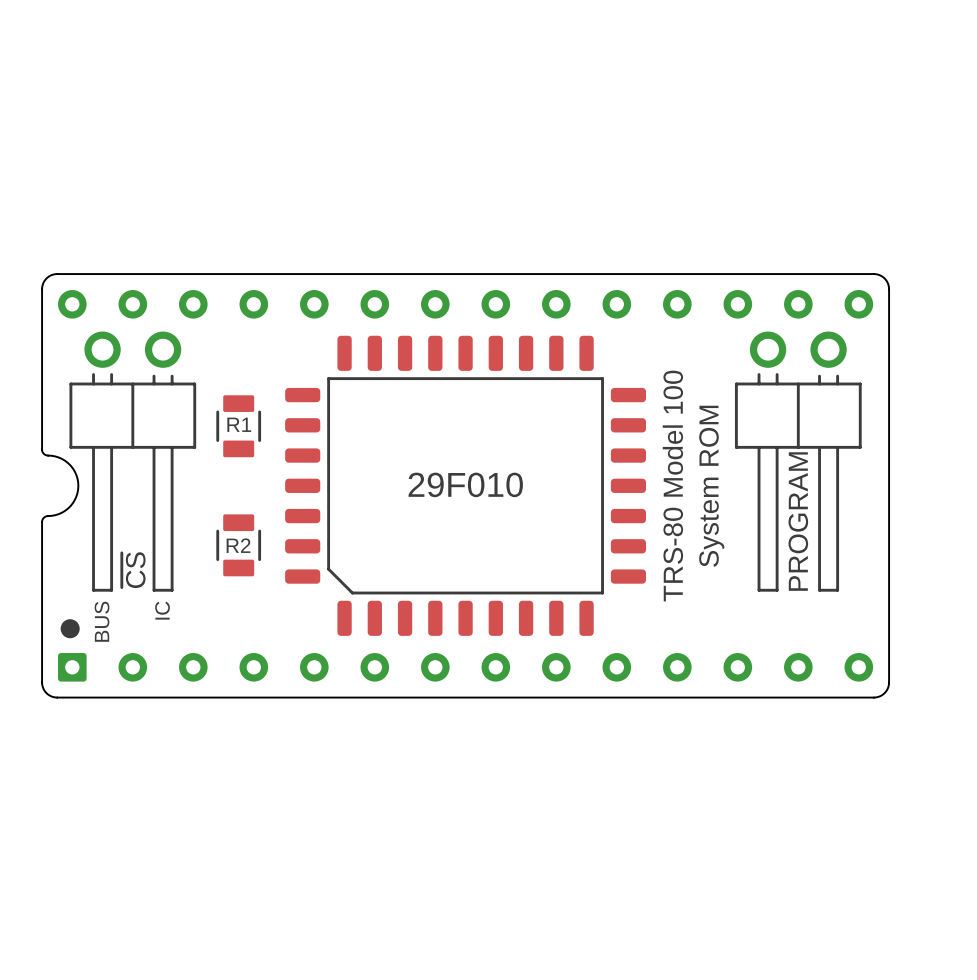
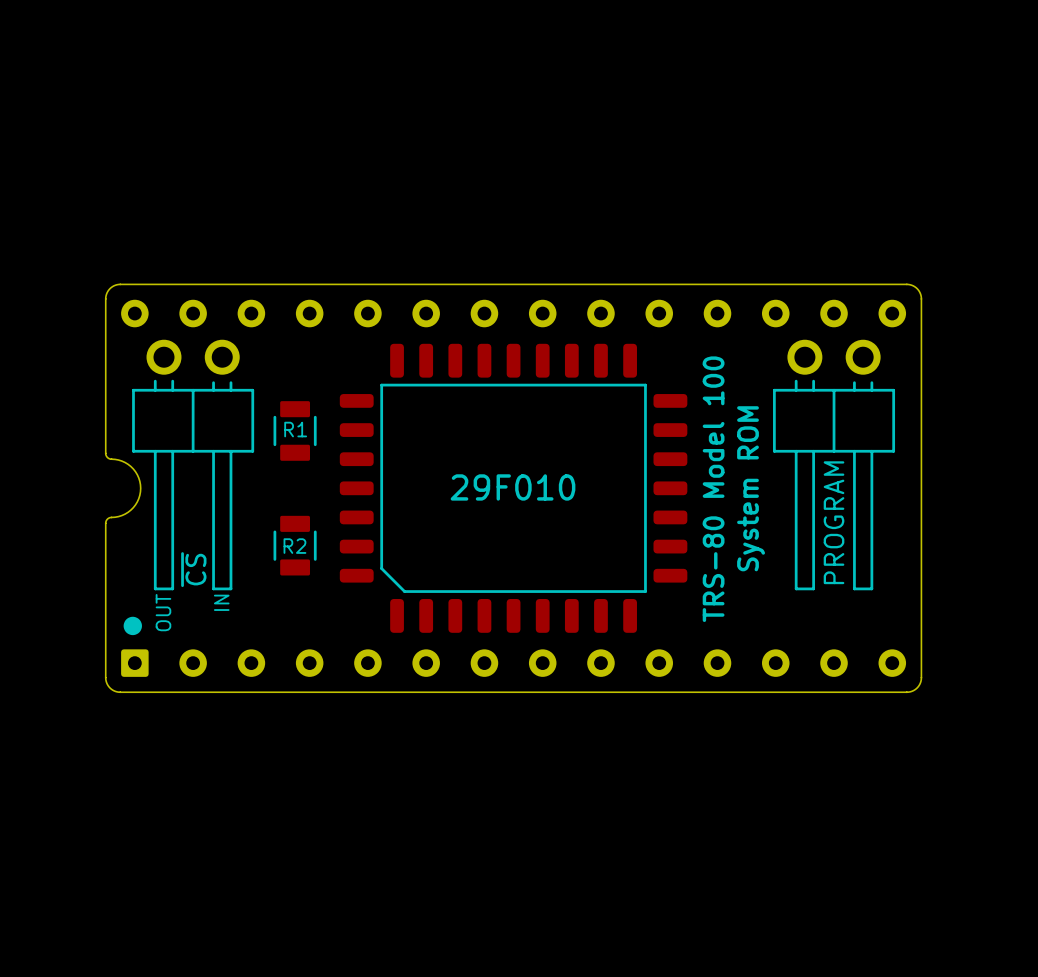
text: IC (162, 610) -> IN (221, 602)
text: BUS (102, 621) -> OUT (163, 612)

